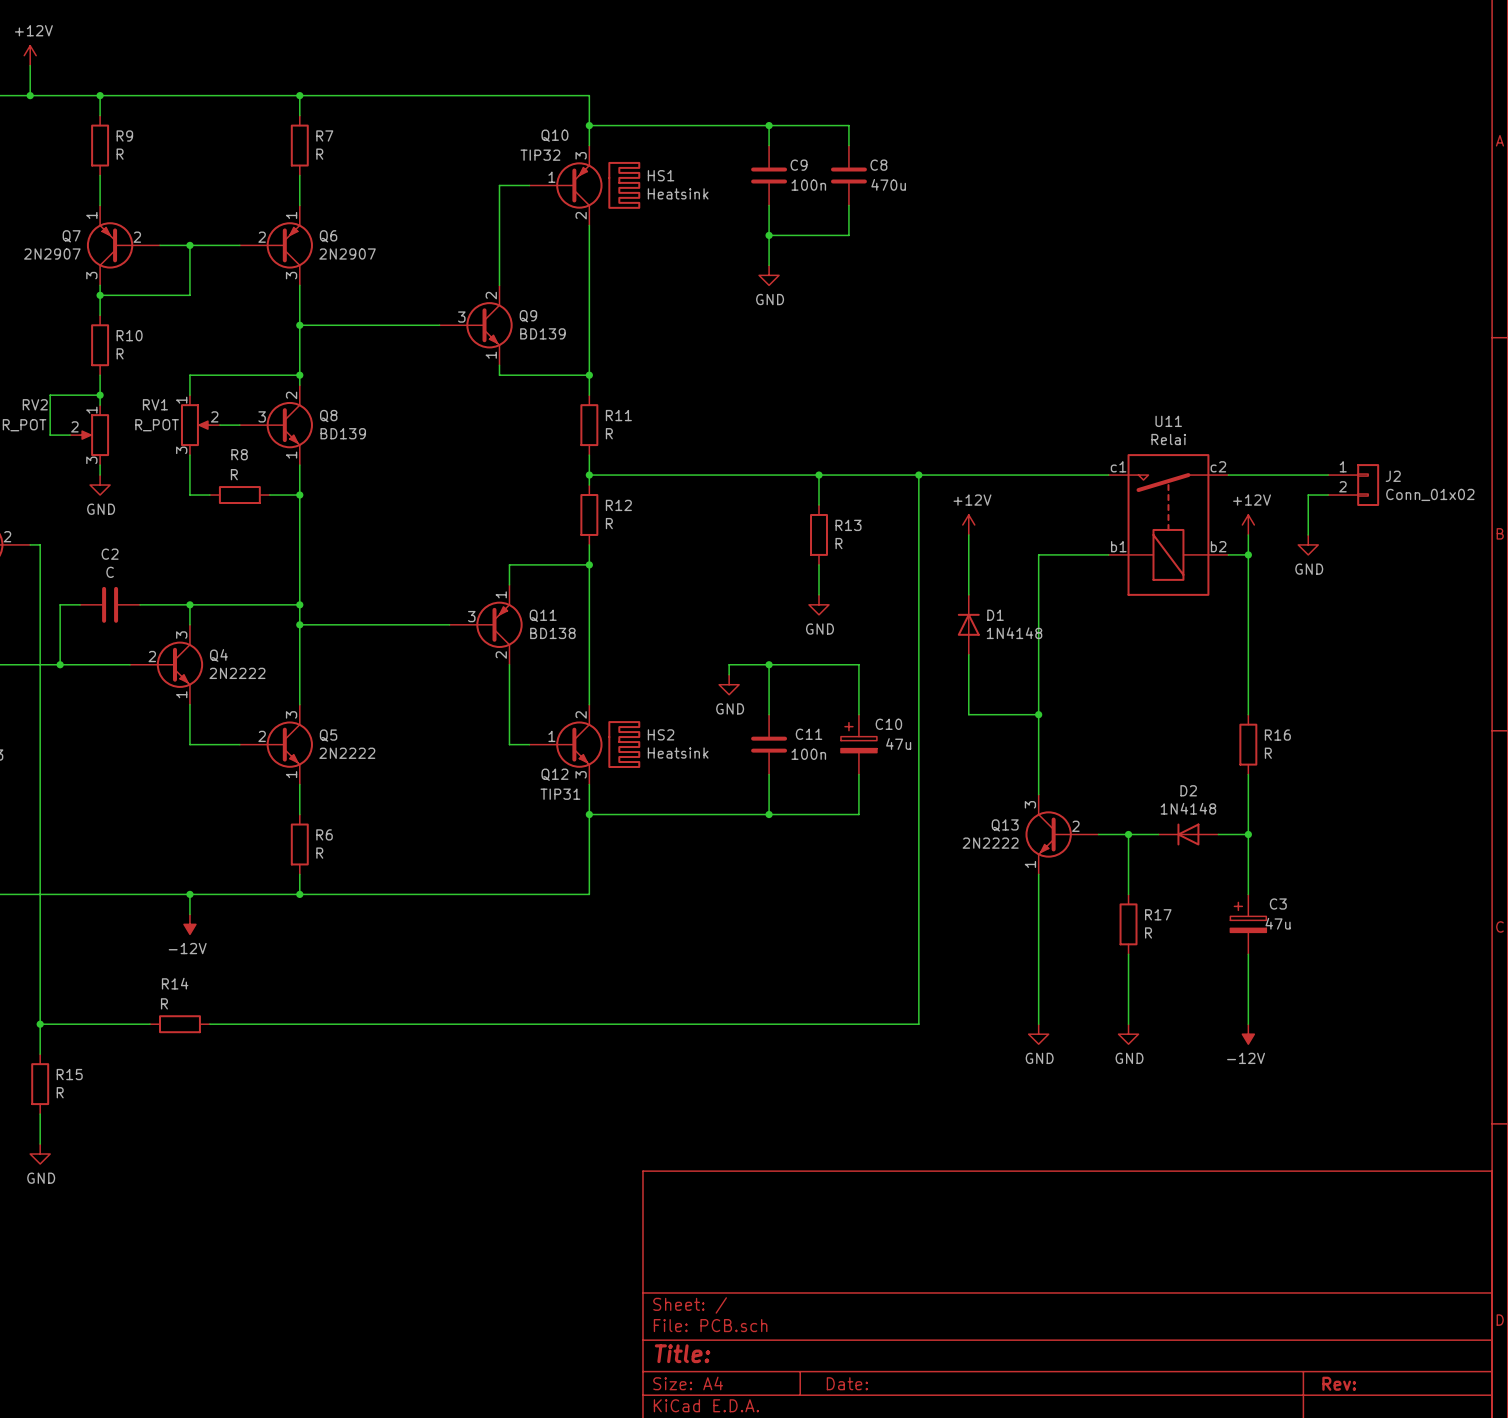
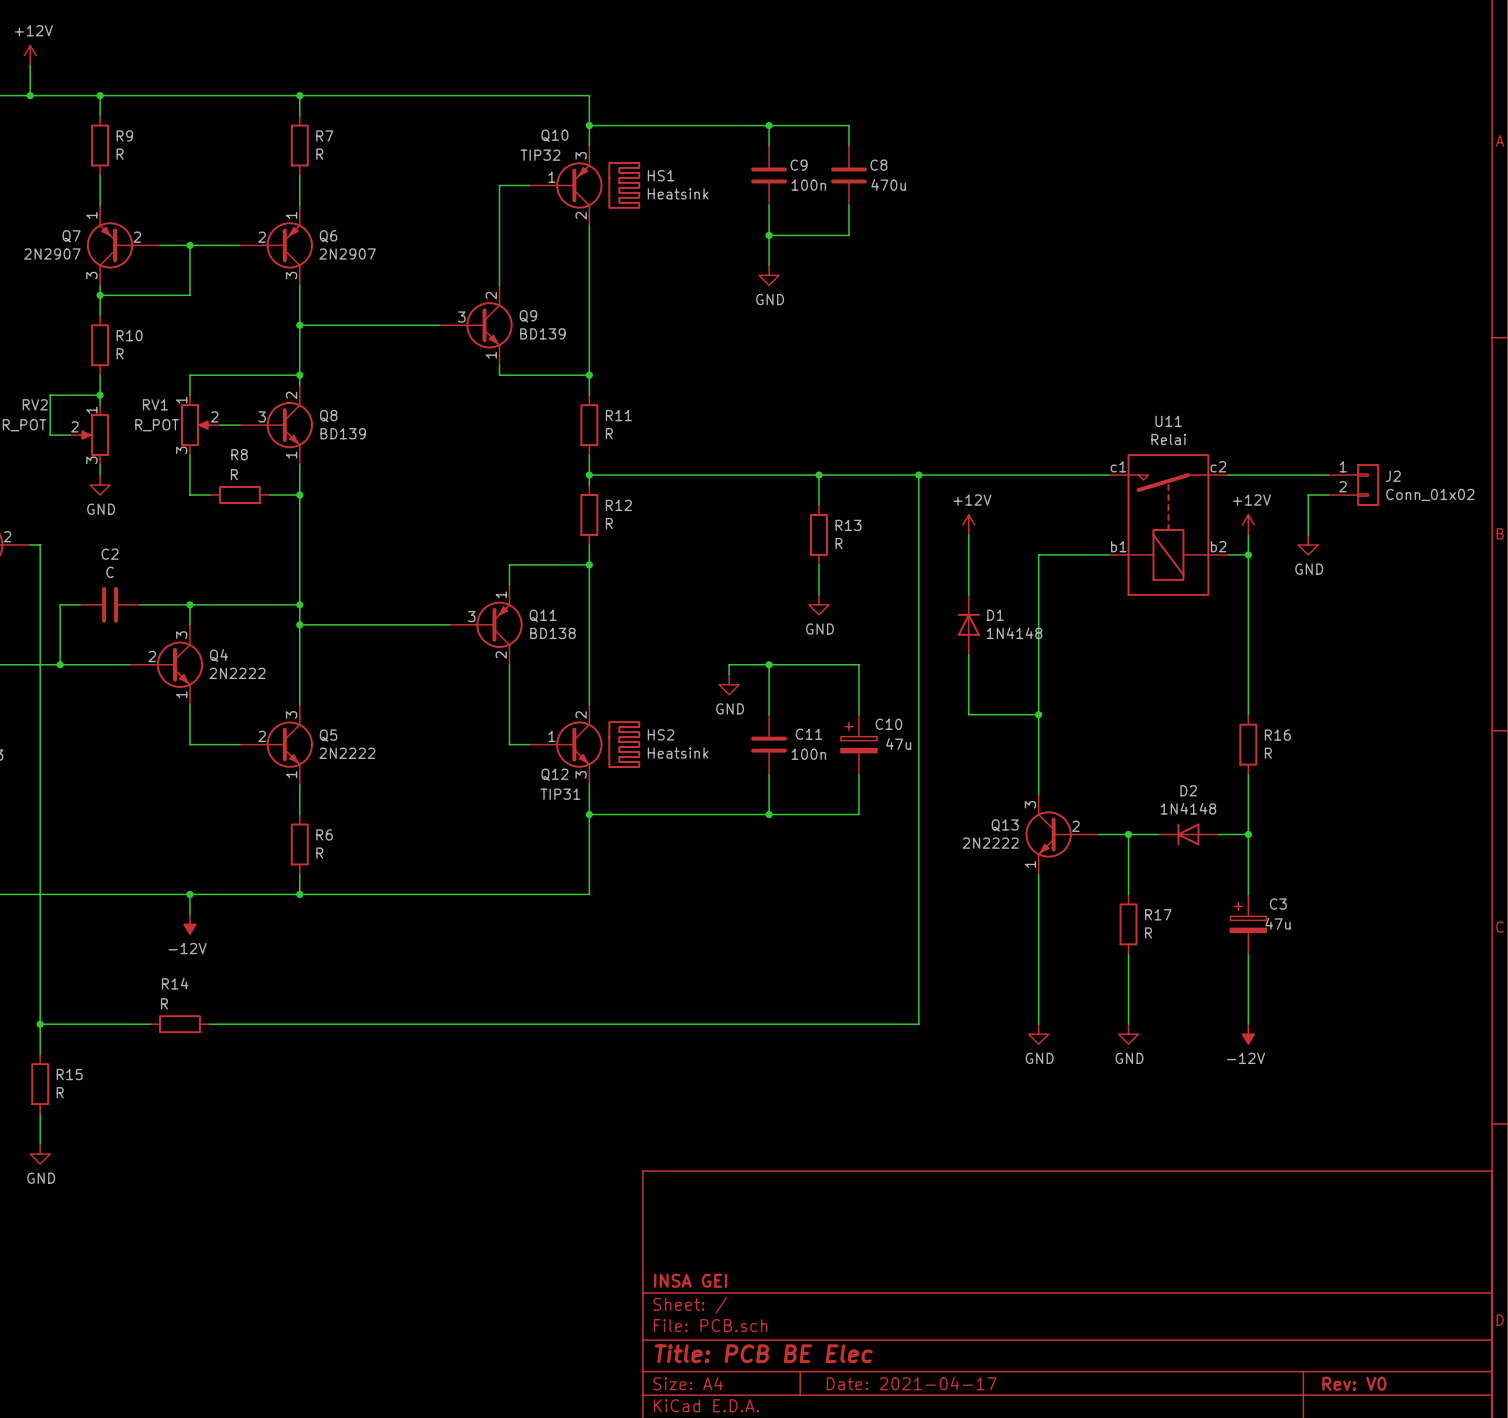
title block: none -> INSA GEI (690, 1280)
title block: Title: (682, 1353) -> Title: PCB BE Elec (763, 1353)
title block: Date: (847, 1383) -> Date: 2021-04-17 (911, 1383)
title block: Rev: (1339, 1383) -> Rev: V0 (1354, 1383)

